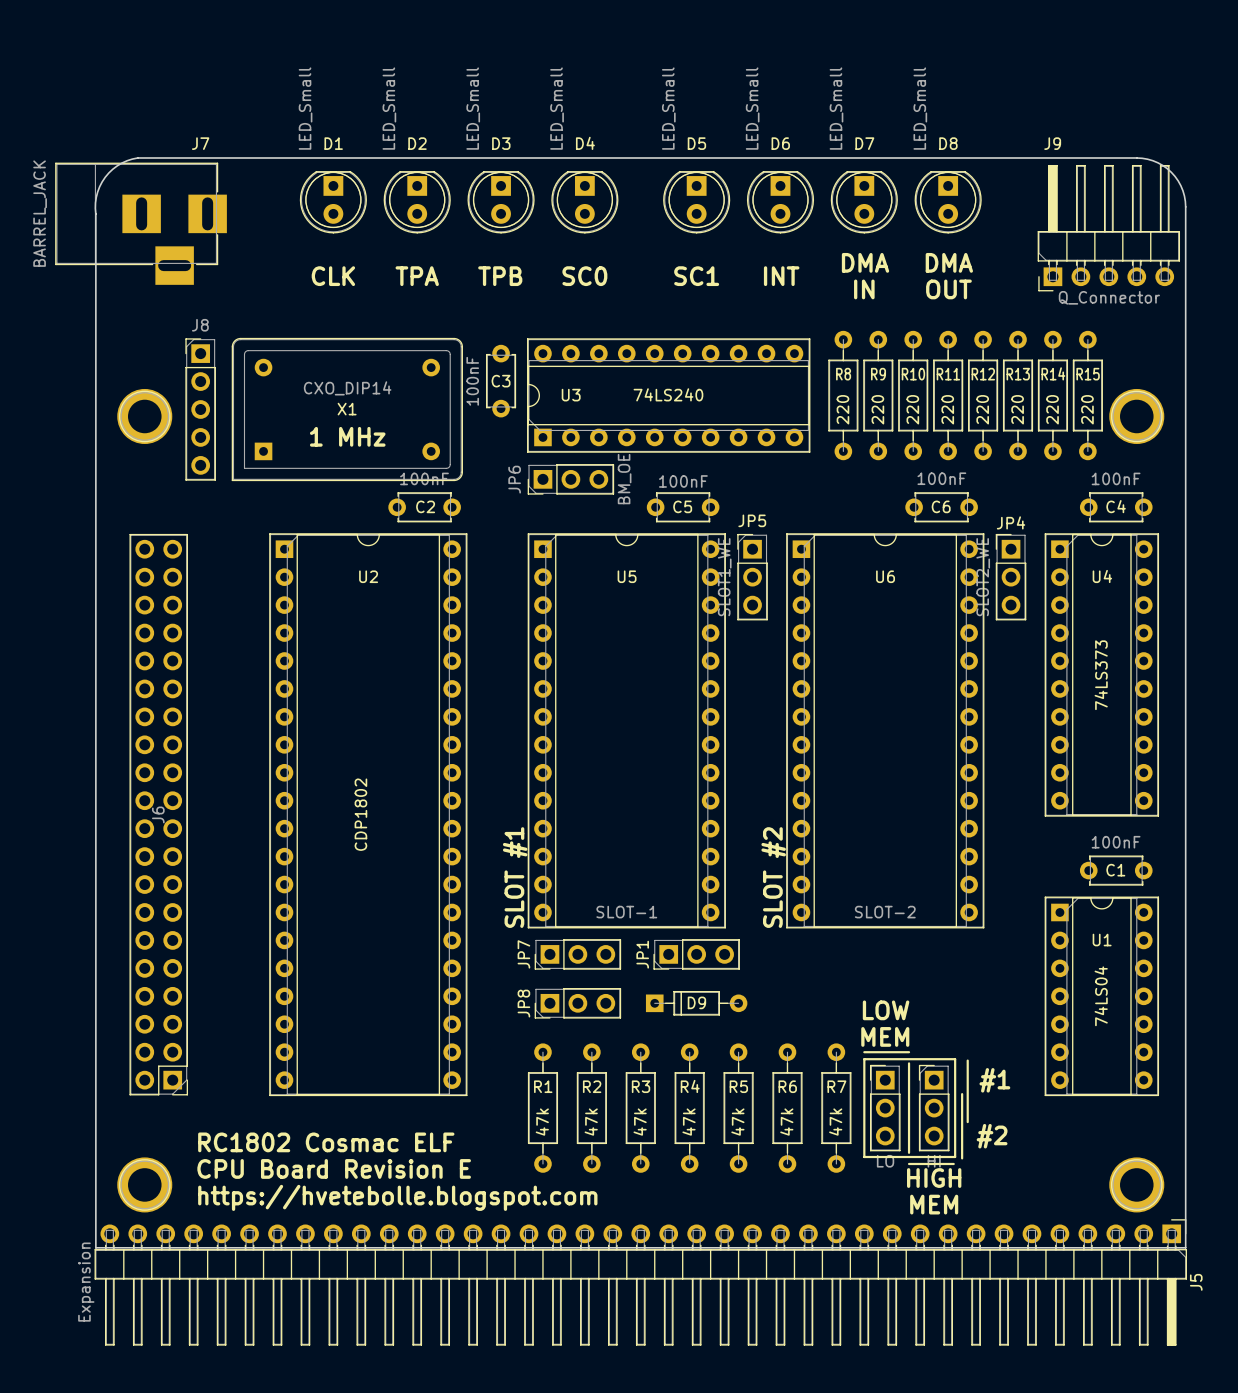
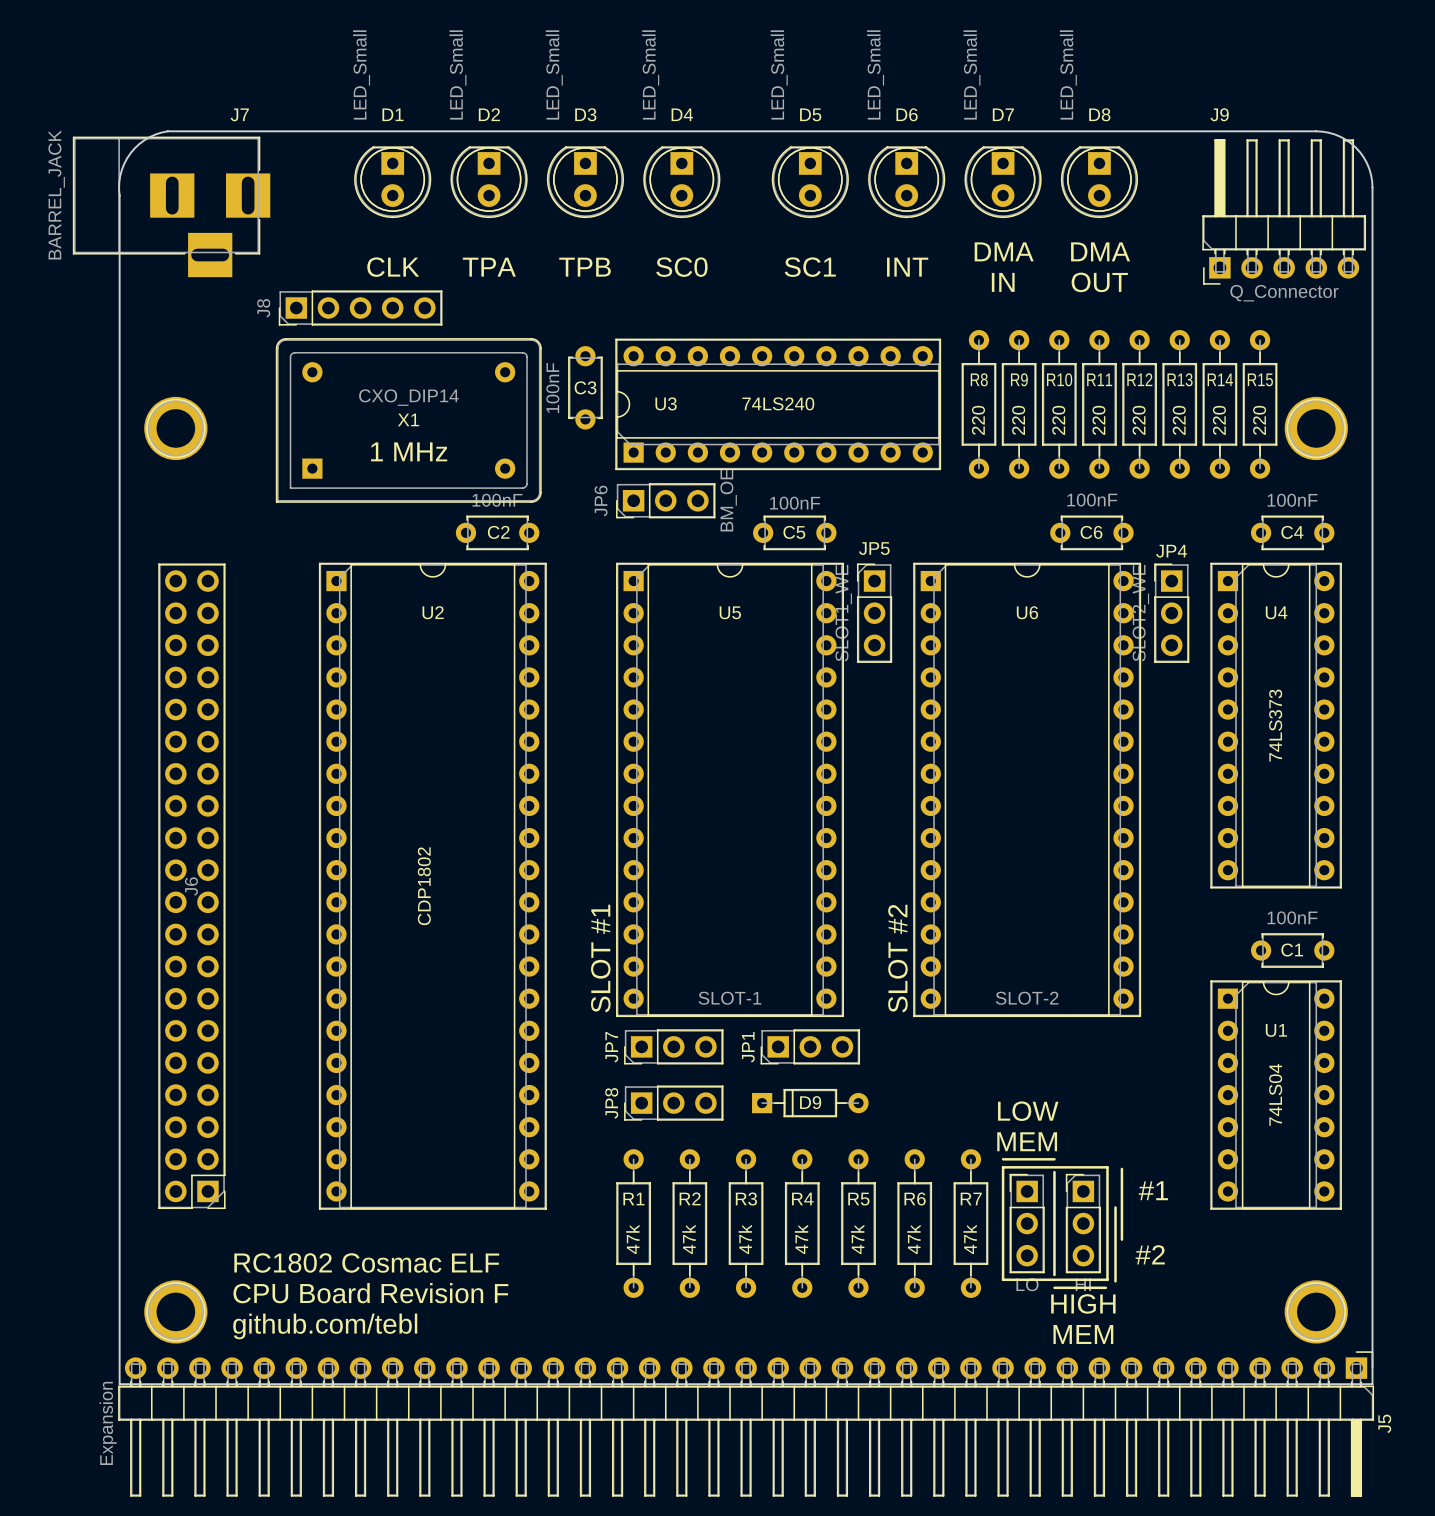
J8 rotation: 0° (200, 409) -> 90° counterclockwise (360, 308)
J8 position: (200, 409) -> (360, 308)
text: CPU Board Revision E (334, 1168) -> CPU Board Revision F (370, 1293)
text: https://hvetebolle.blogspot.com (397, 1197) -> github.com/tebl (325, 1326)

